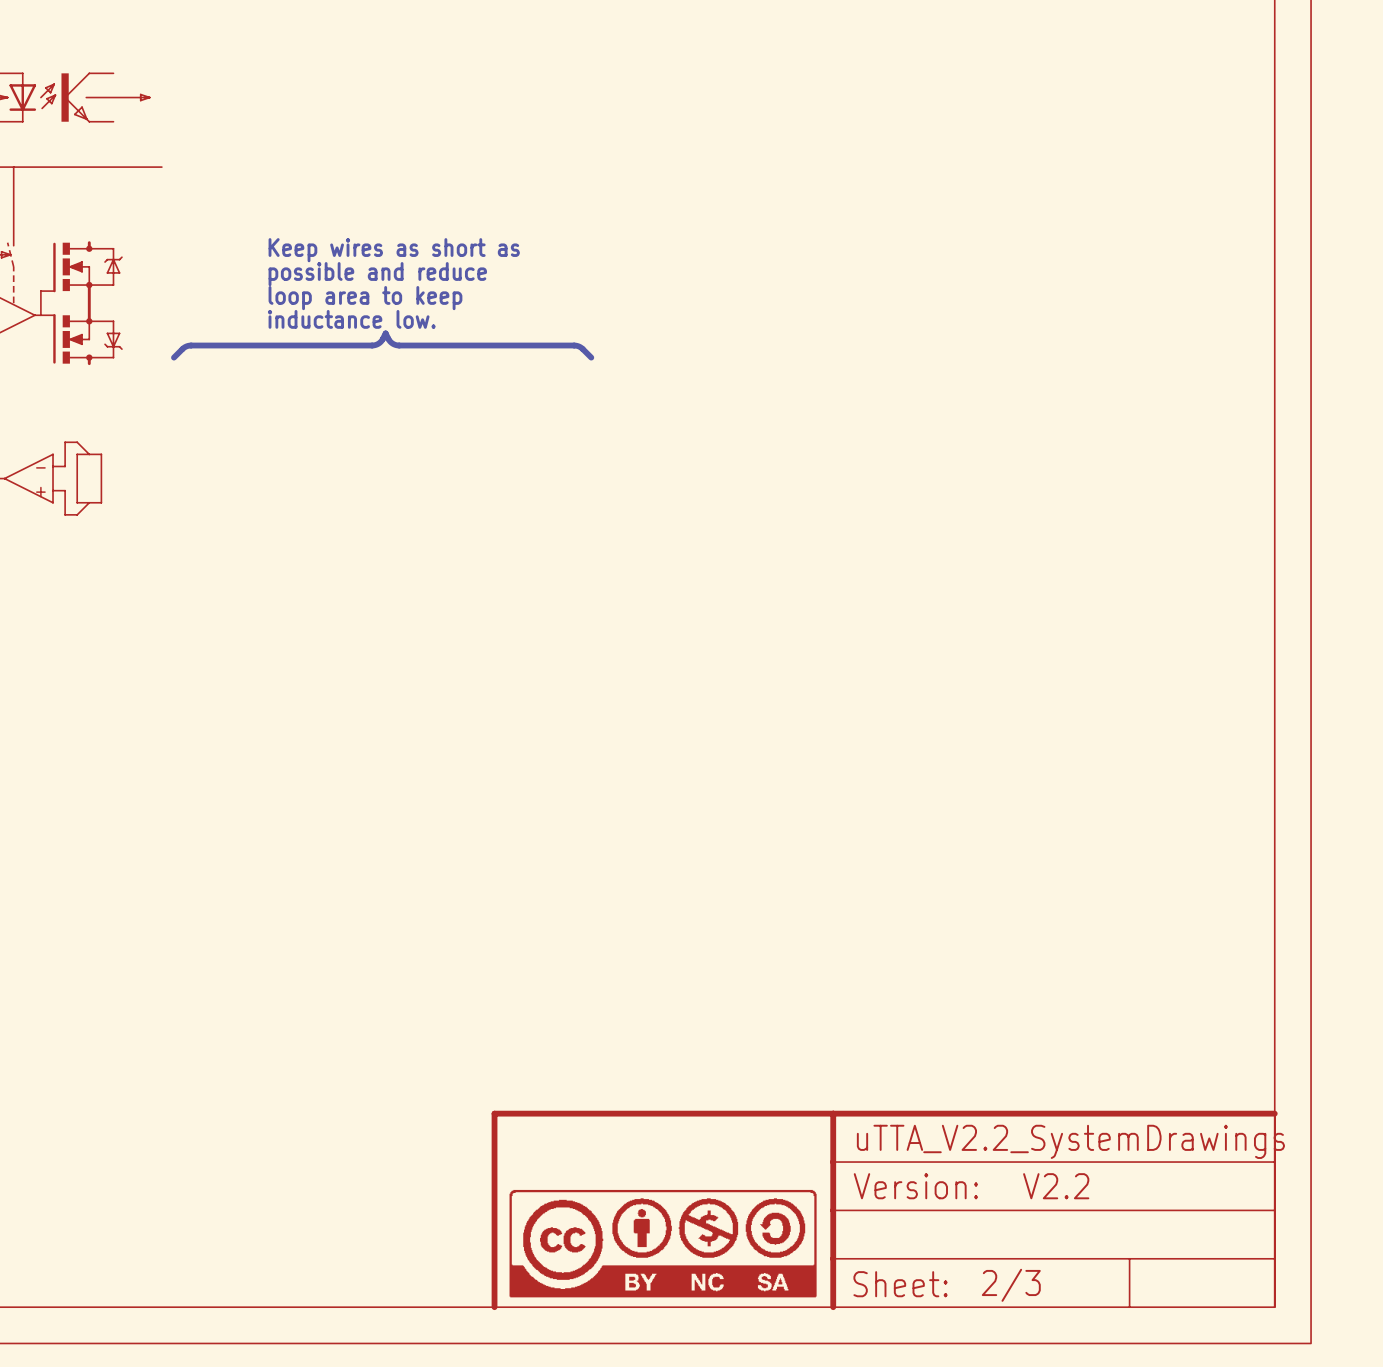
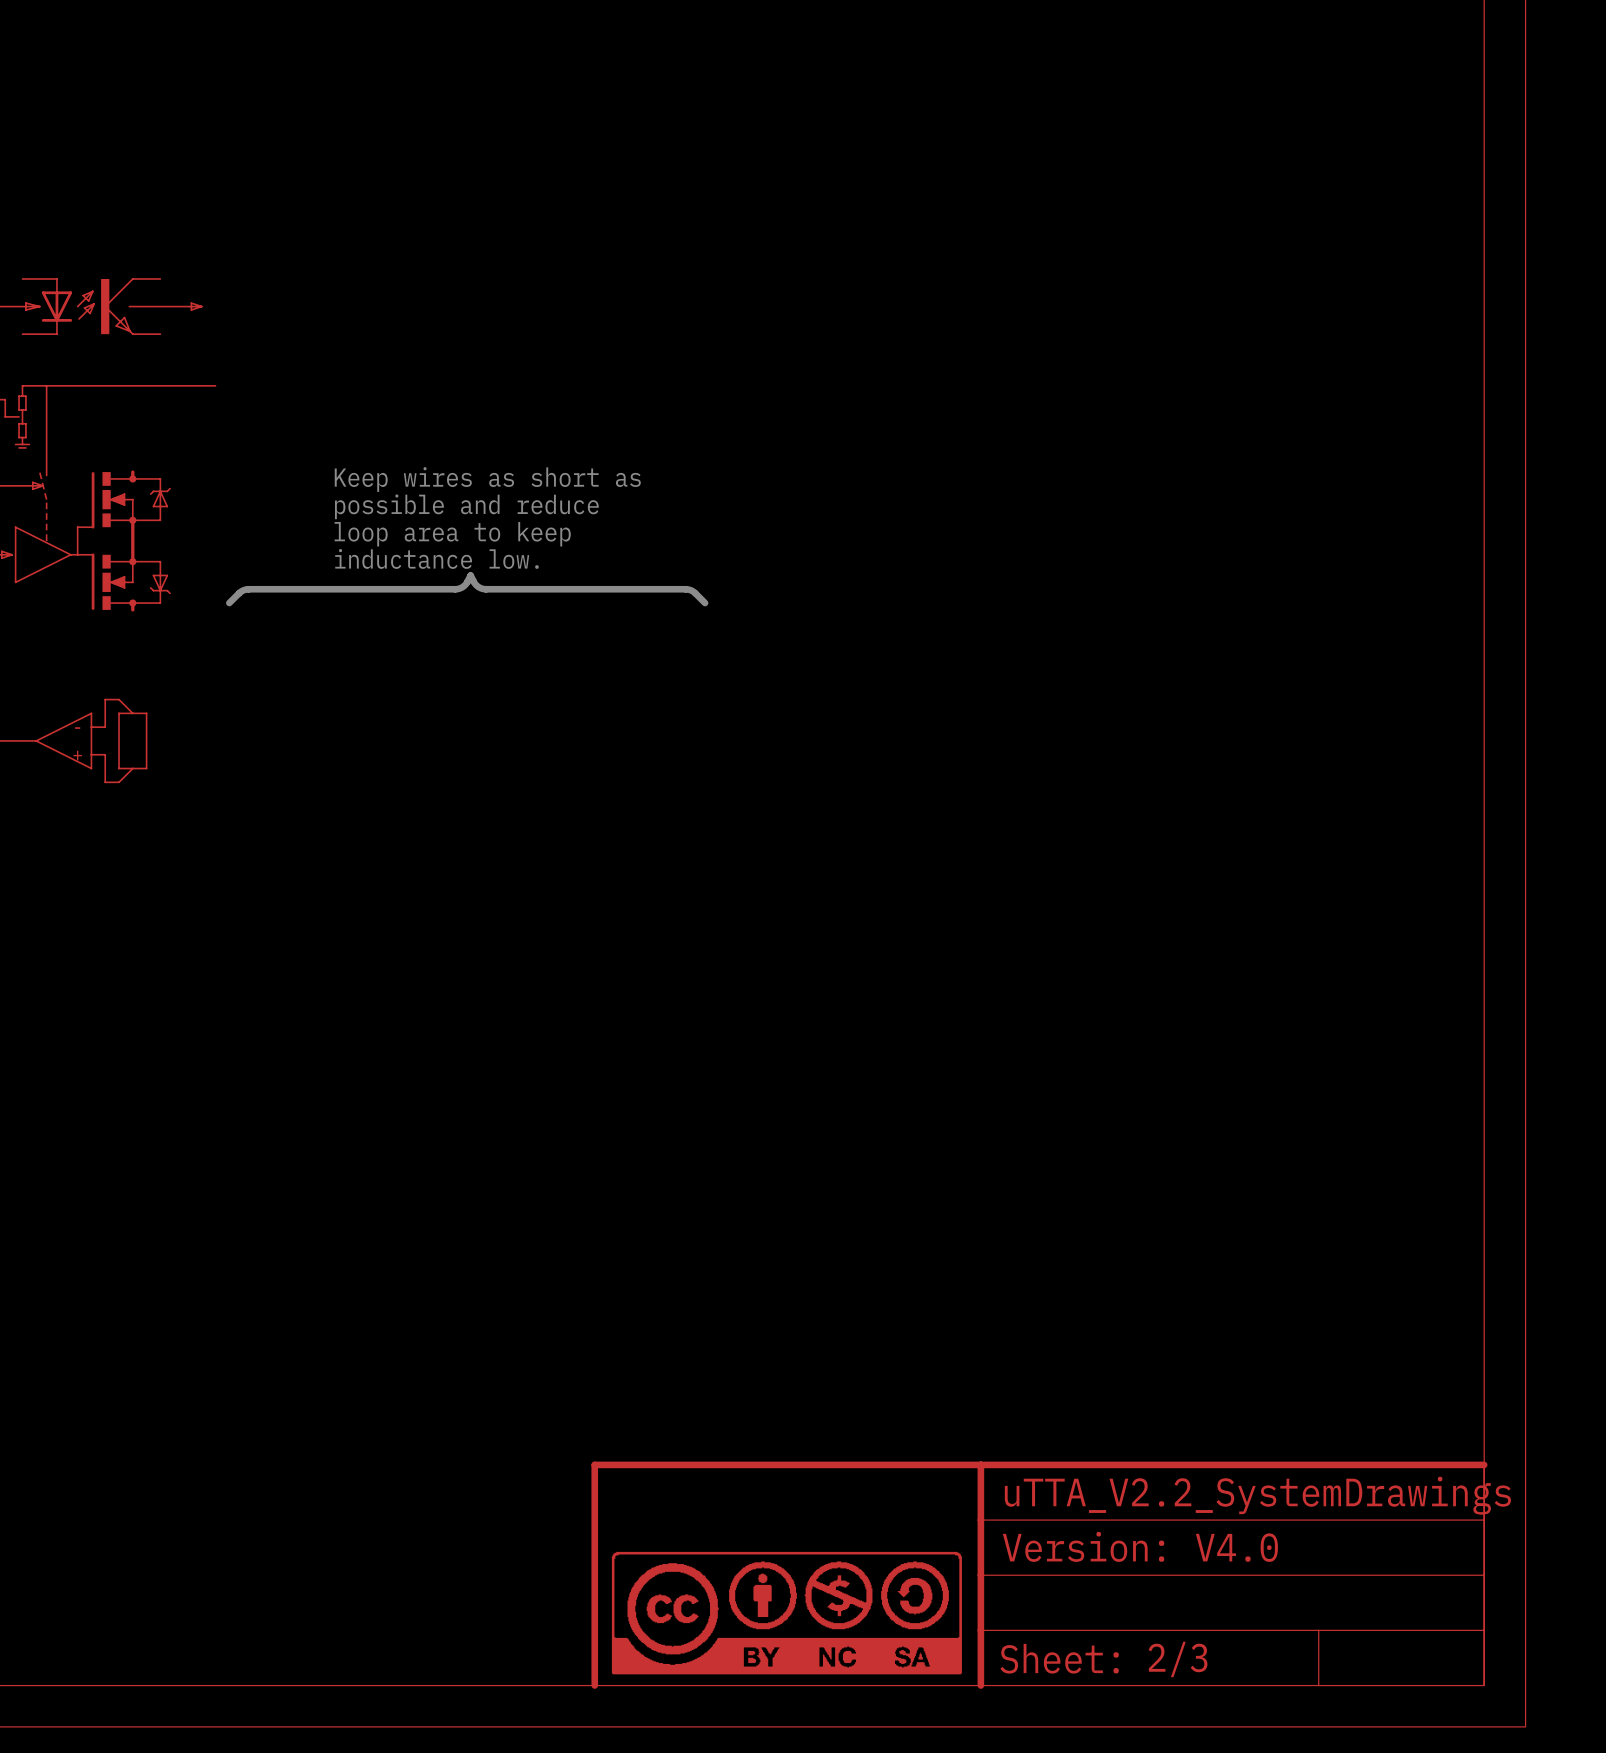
part text: V2.2 (1056, 1186) -> V4.0 (1236, 1547)

